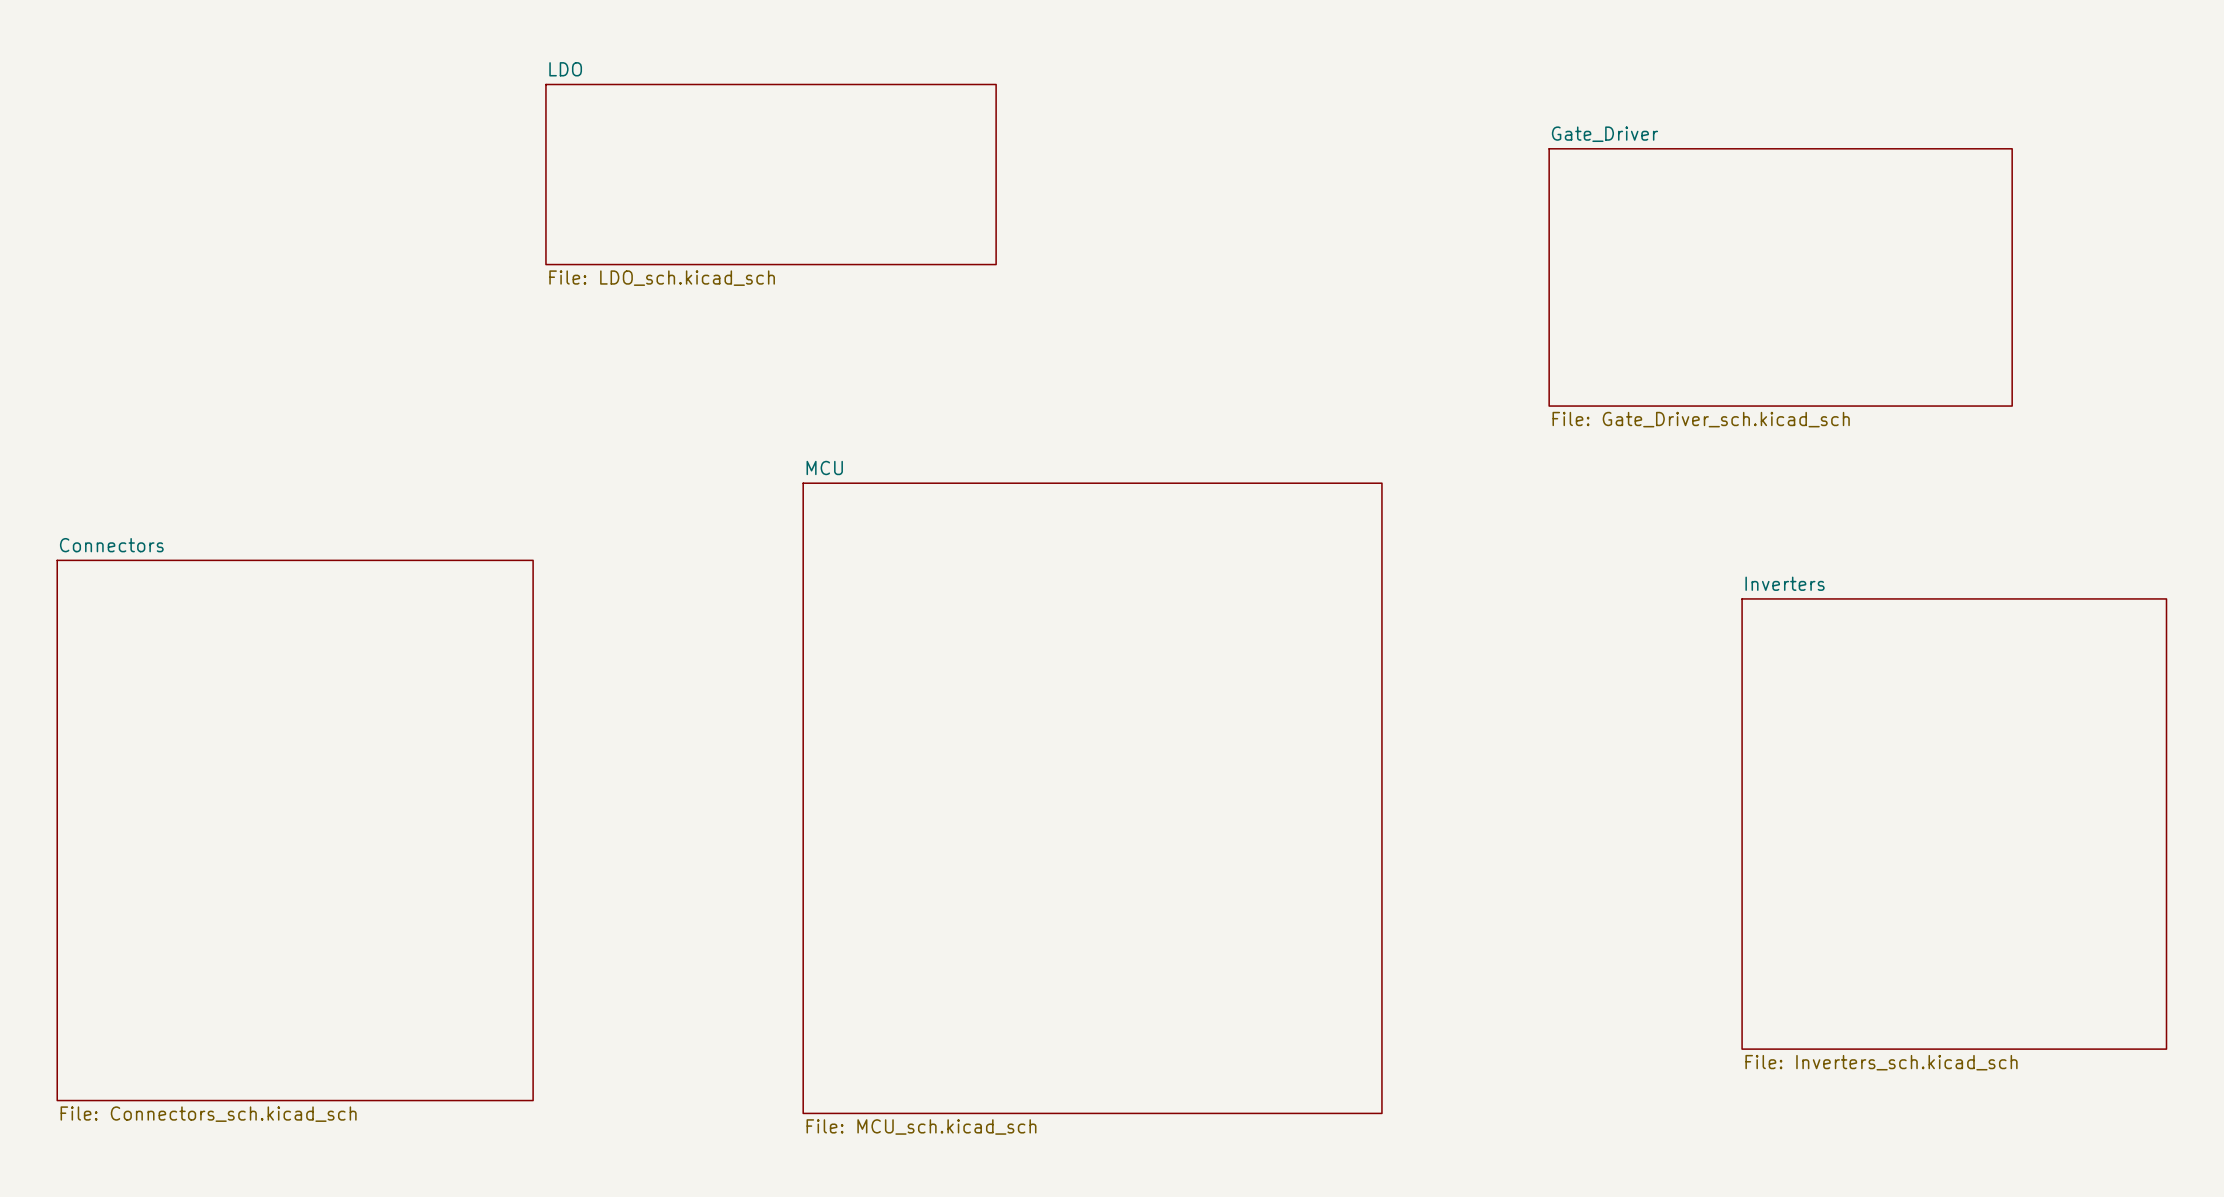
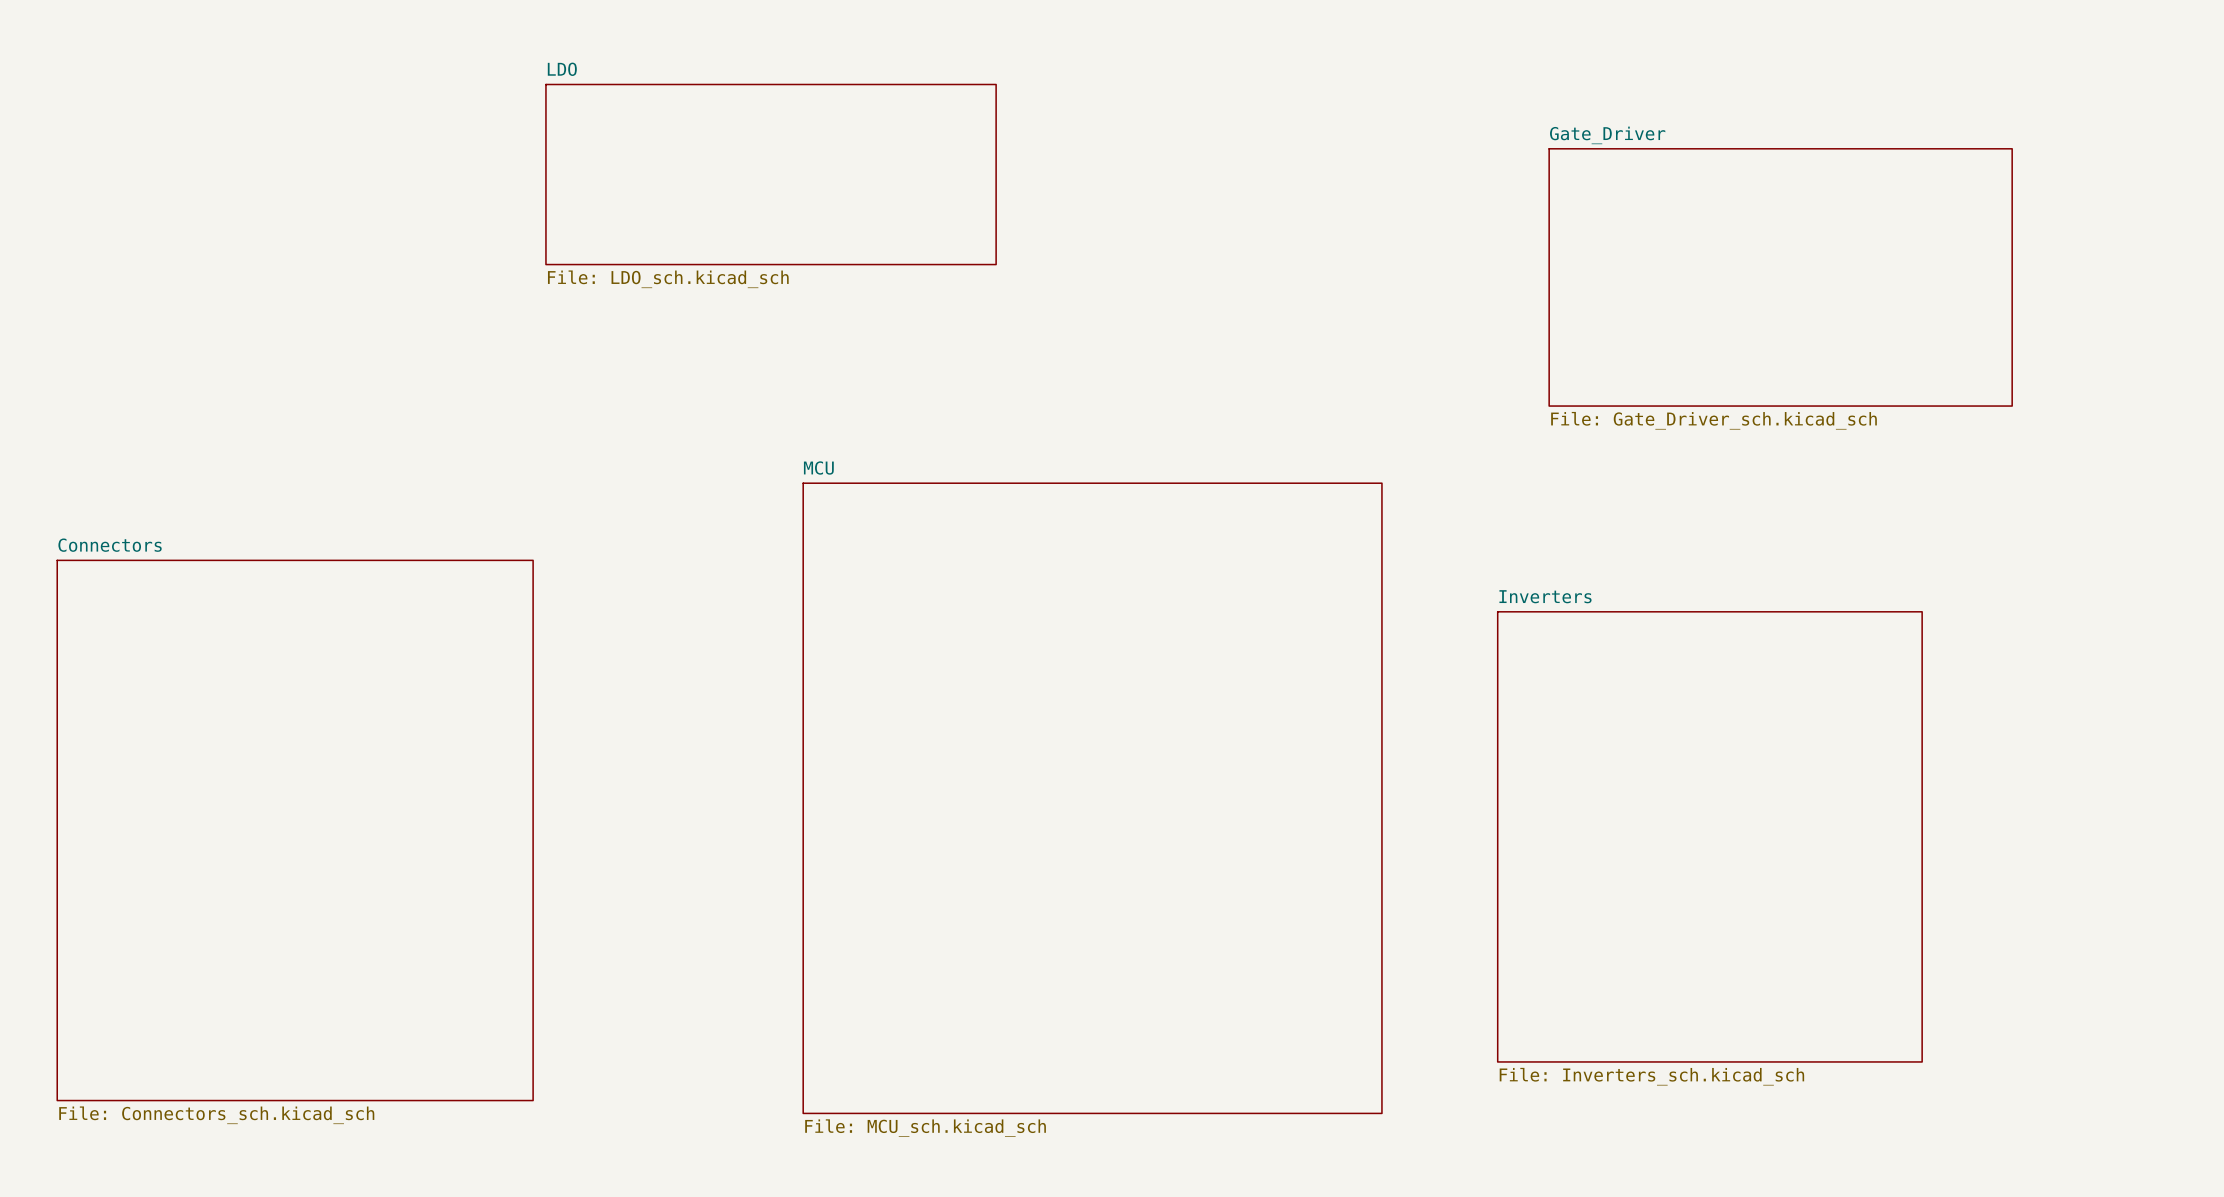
sheet Inverters position: (1954, 824) -> (1709, 836)

